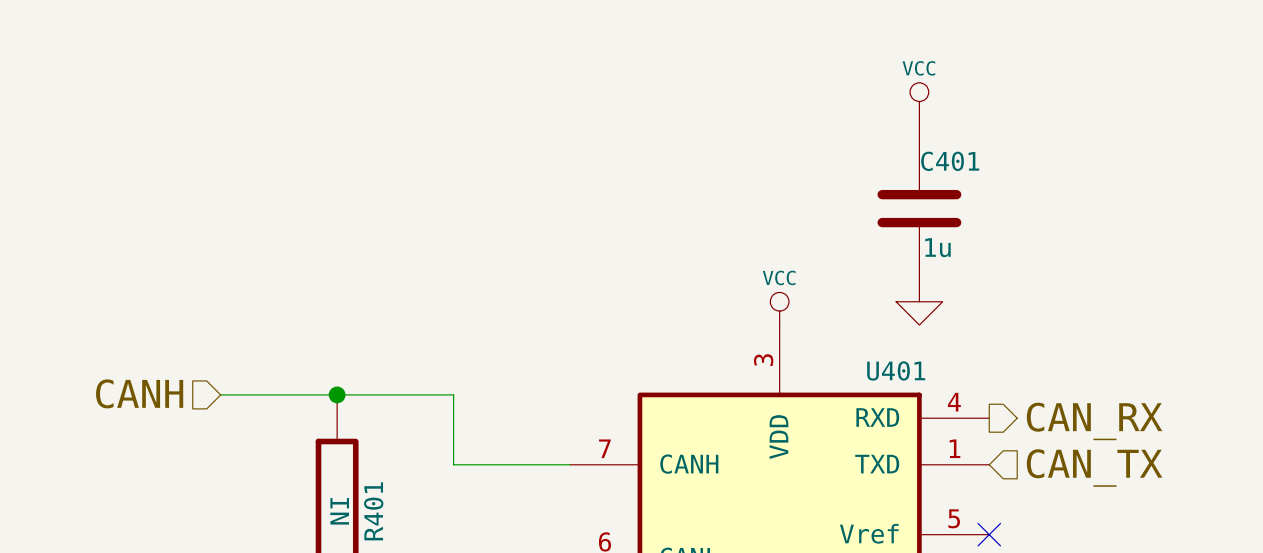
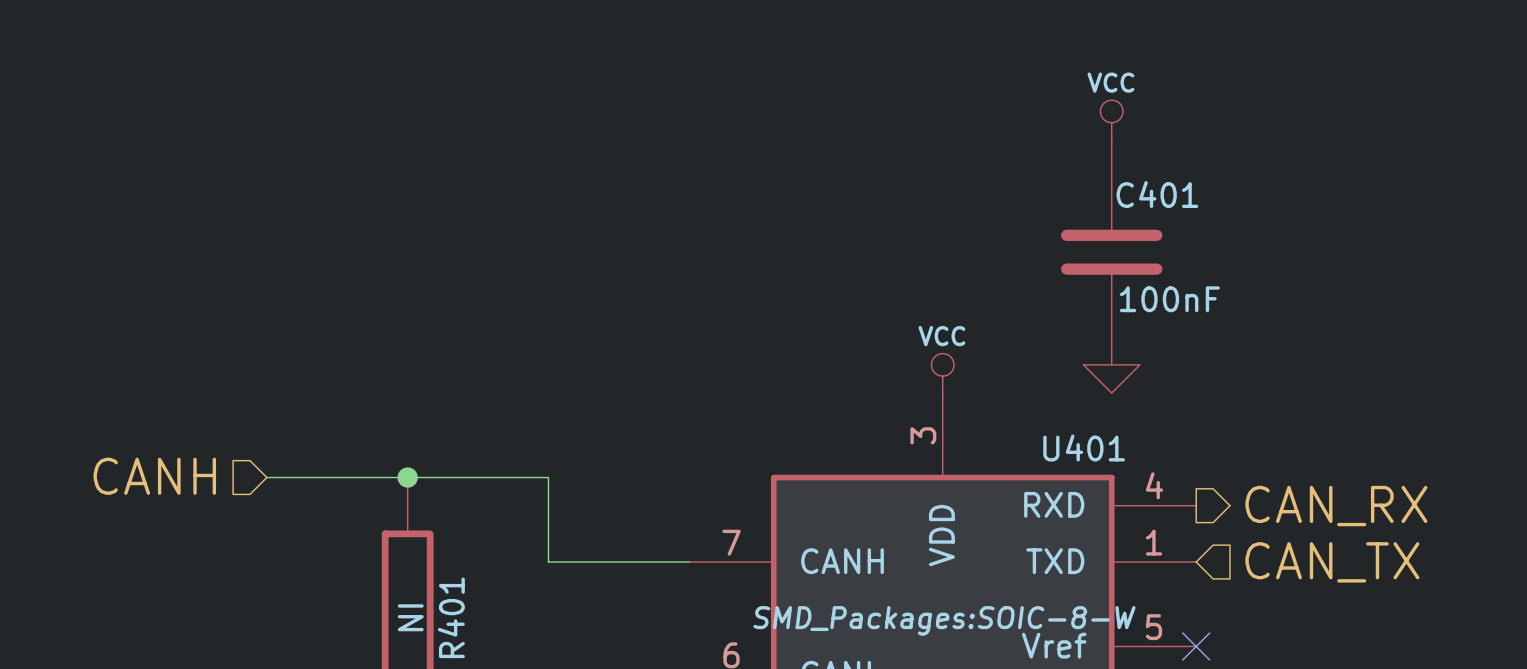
C401 value: 1u (937, 247) -> 100nF (1169, 299)
U401 text: none -> SMD_Packages:SOIC-8-W (944, 620)

